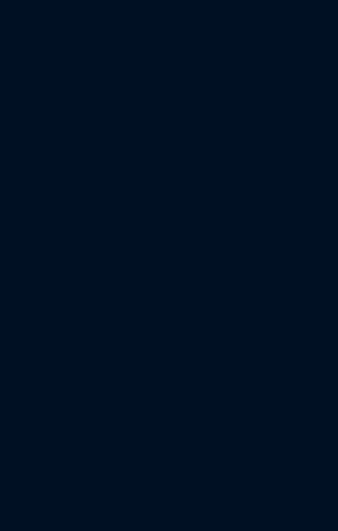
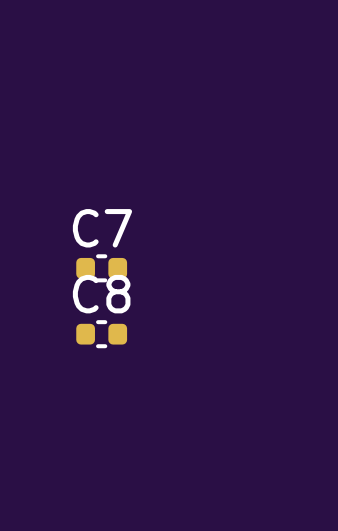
C7: none -> (101, 268)
C8: none -> (101, 334)

